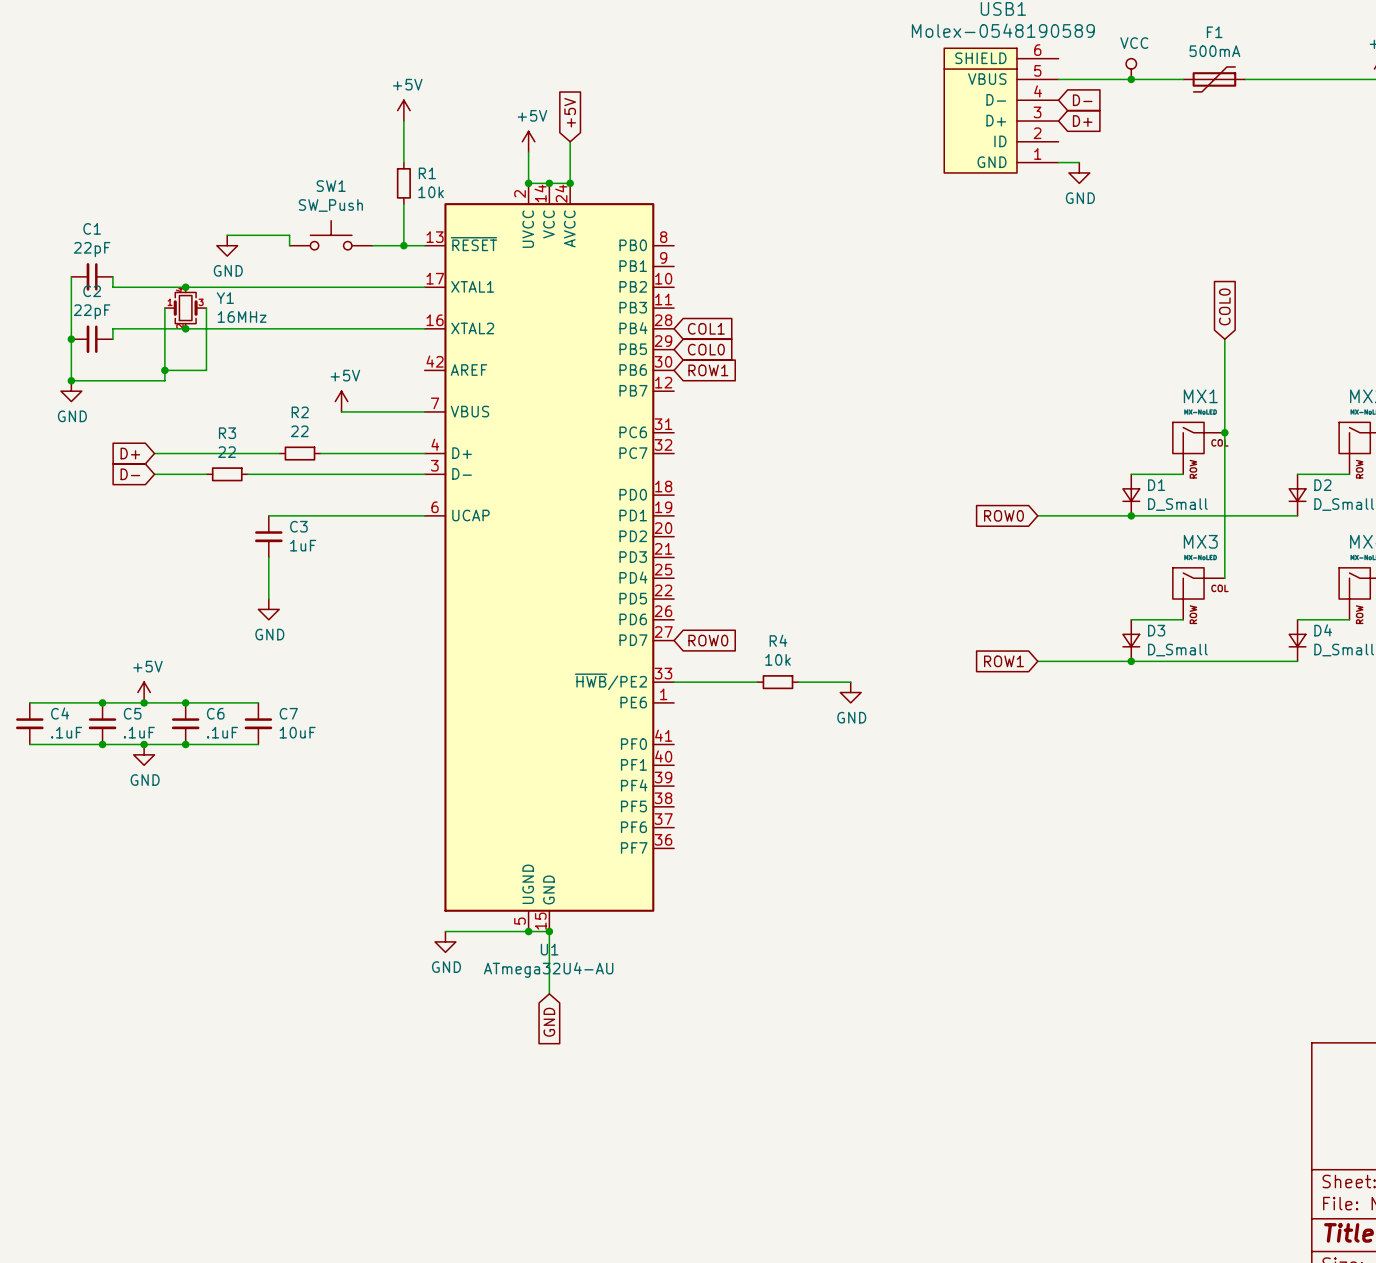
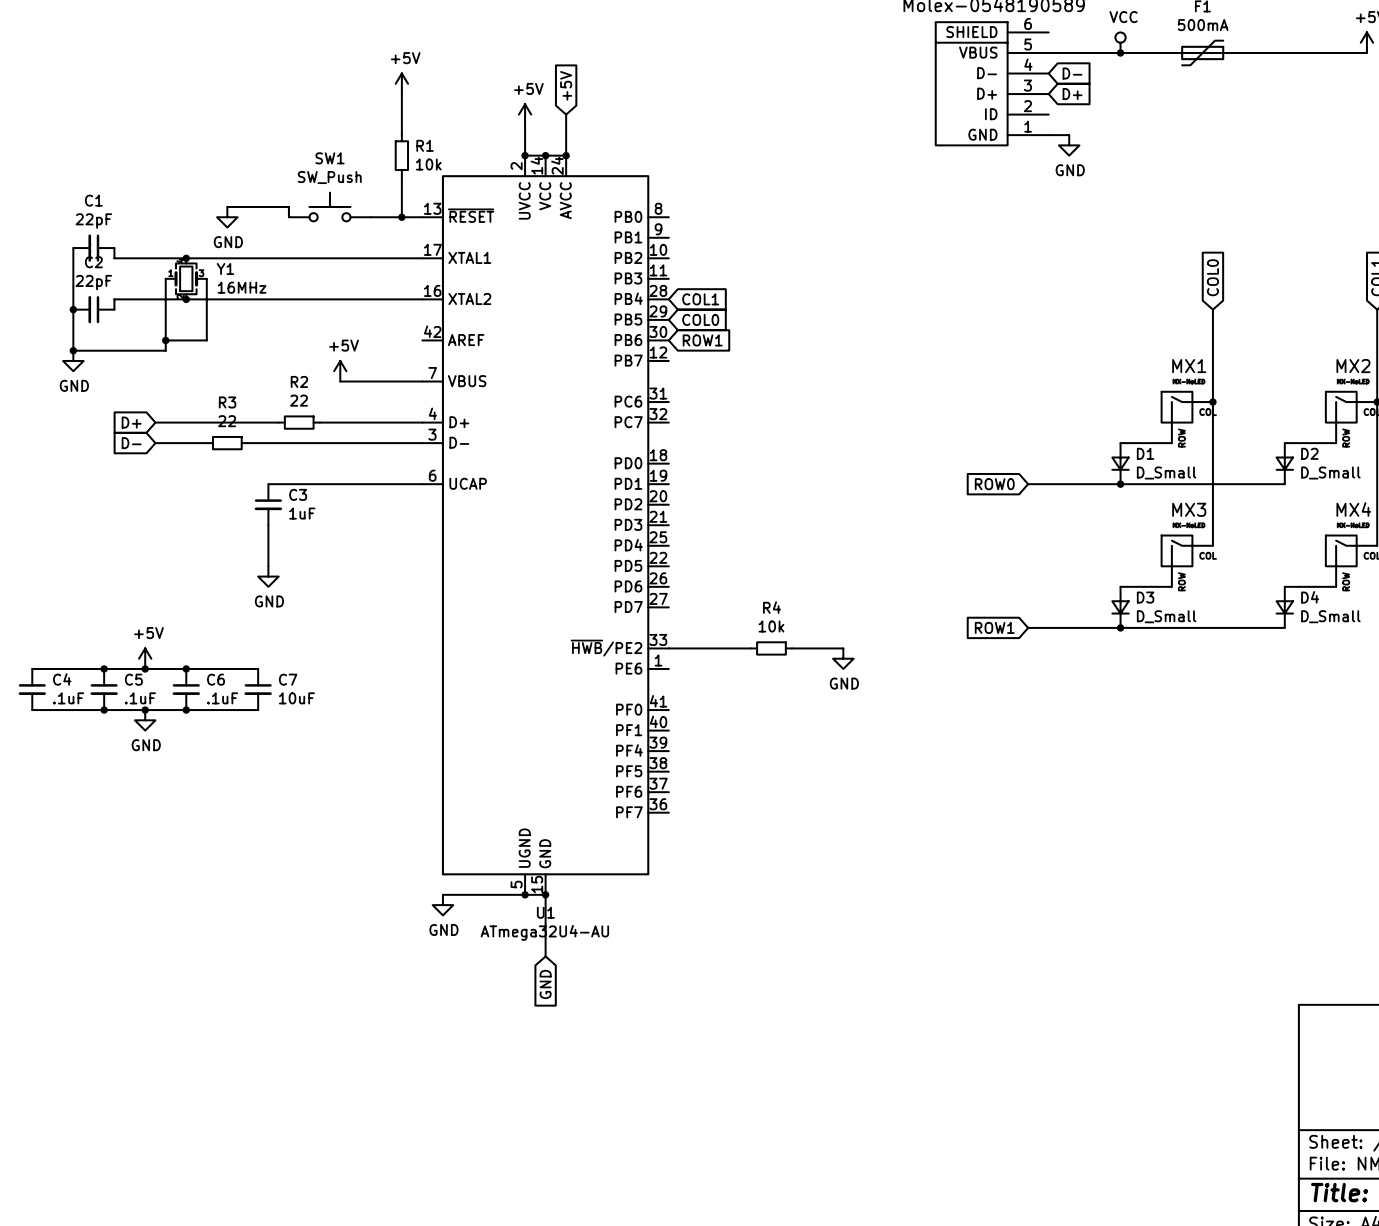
global label: ROW0 (708, 640) -> none

